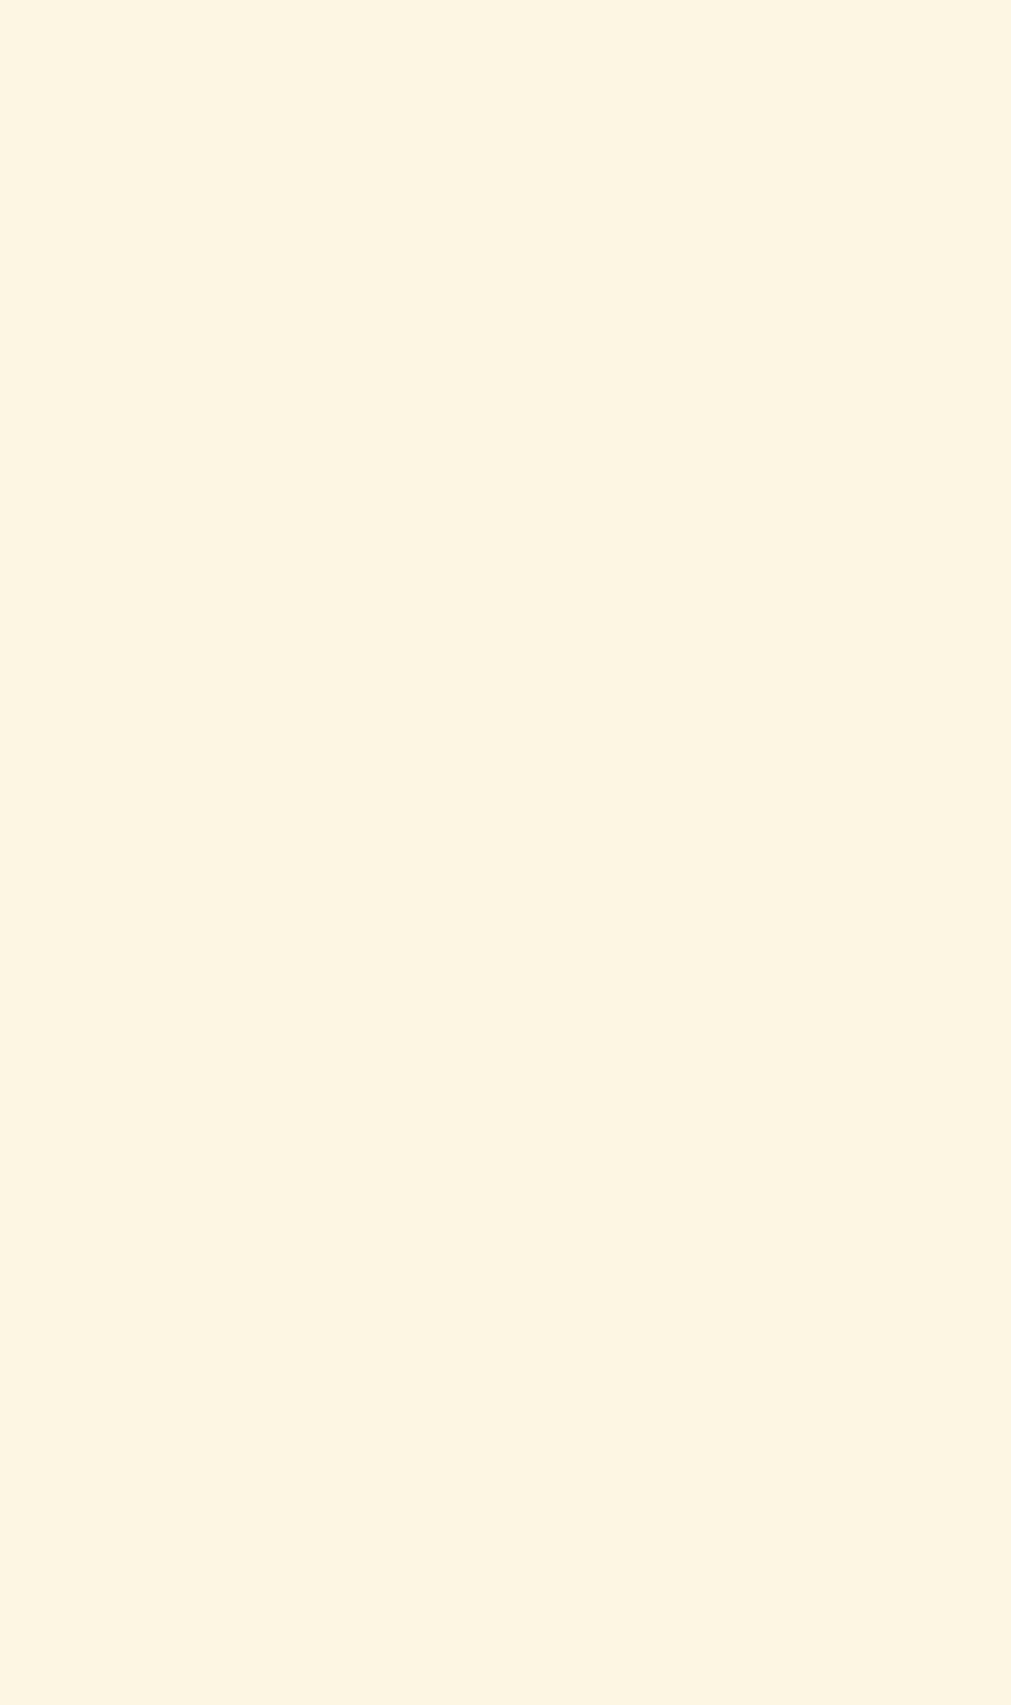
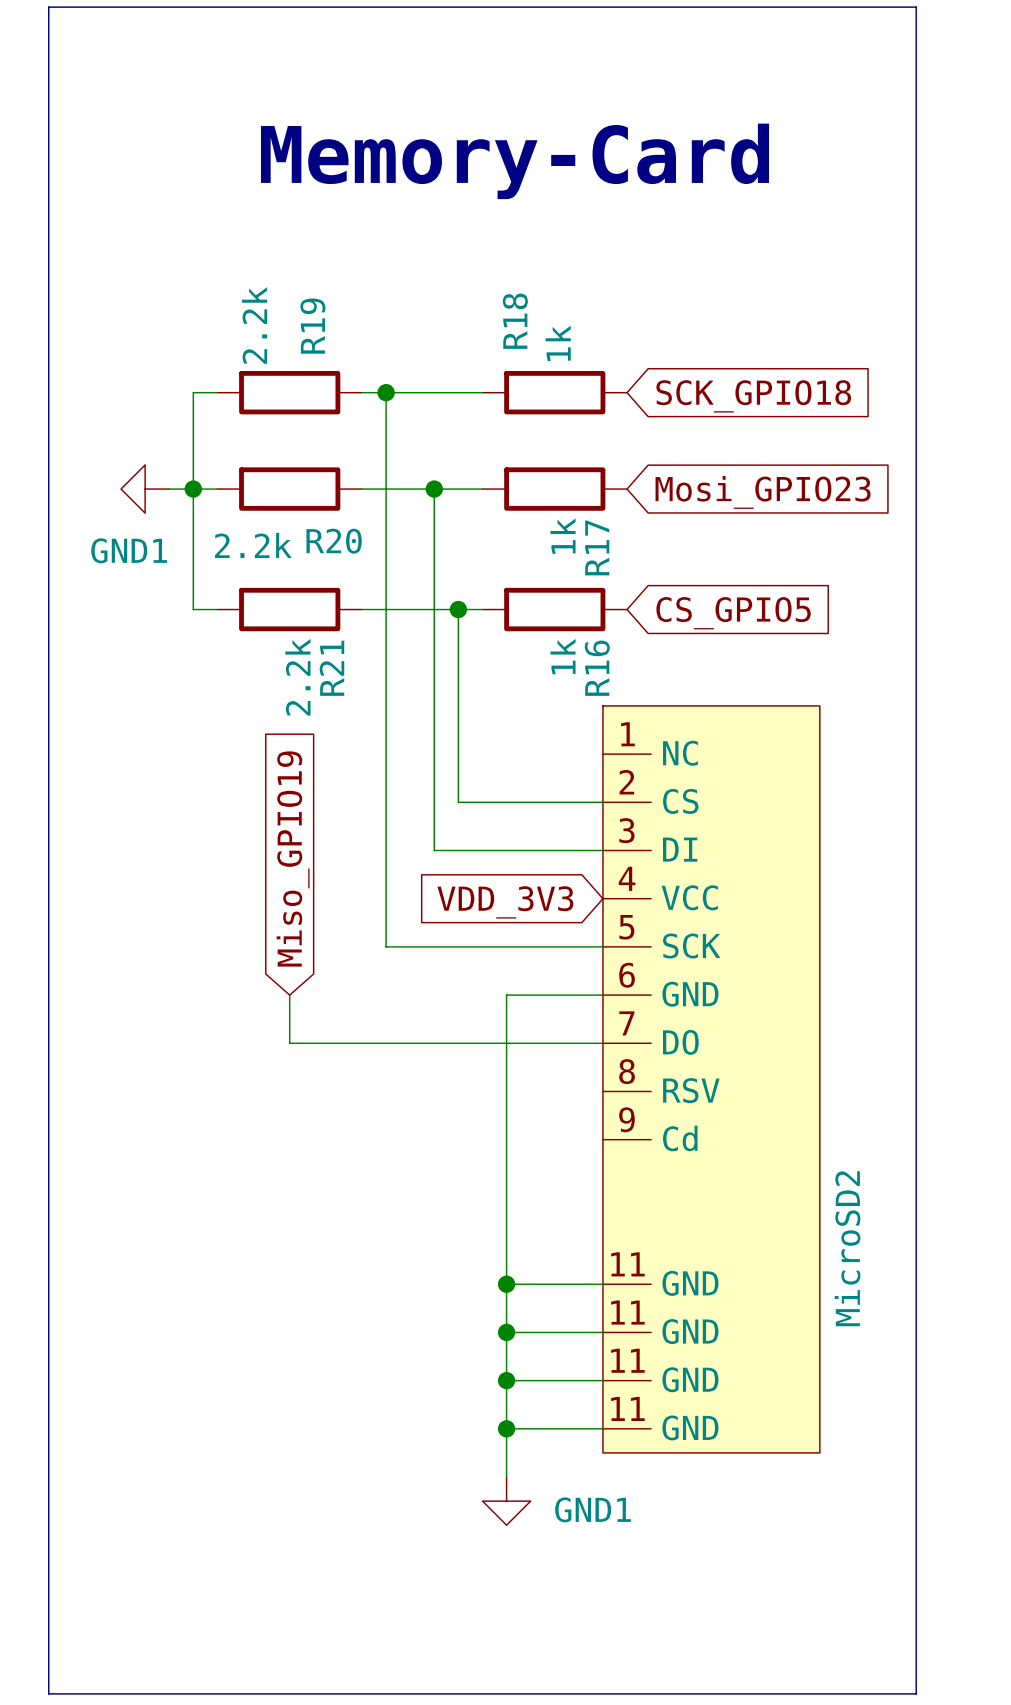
line: none -> (48, 7) (916, 7) (916, 1693) (48, 1693) (48, 7)
text: none -> Memory-Card (514, 161)
wire: none -> (217, 392) (193, 392) (193, 609) (217, 609)
R19: none -> 2.2k (289, 392)
wire: none -> (361, 392) (482, 392)
wire: none -> (386, 392) (386, 946) (602, 946)
junction: none -> (386, 392)
R18: none -> 1k (554, 392)
global label: none -> SCK_GPIO18 (753, 396)
power symbol: none -> GND1 (145, 489)
wire: none -> (169, 489) (217, 489)
junction: none -> (193, 489)
R20: none -> 2.2k (289, 489)
wire: none -> (361, 489) (482, 489)
wire: none -> (434, 489) (434, 850) (602, 850)
junction: none -> (434, 489)
R17: none -> 1k (554, 489)
global label: none -> Mosi_GPIO23 (763, 492)
R21: none -> 2.2k (289, 609)
wire: none -> (361, 609) (482, 609)
wire: none -> (458, 609) (458, 802) (602, 802)
junction: none -> (458, 609)
R16: none -> 1k (554, 609)
global label: none -> CS_GPIO5 (733, 613)
global label: none -> Miso_GPIO19 (293, 858)
global label: none -> VDD_3V3 (505, 902)
wire: none -> (289, 995) (289, 1043) (602, 1043)
wire: none -> (602, 995) (506, 995) (506, 1477)
MicroSD2: none -> (711, 1079)
wire: none -> (506, 1284) (602, 1284)
junction: none -> (506, 1284)
wire: none -> (506, 1332) (602, 1332)
junction: none -> (506, 1332)
wire: none -> (506, 1380) (602, 1380)
junction: none -> (506, 1380)
wire: none -> (506, 1428) (602, 1428)
junction: none -> (506, 1428)
power symbol: none -> GND1 (506, 1501)

